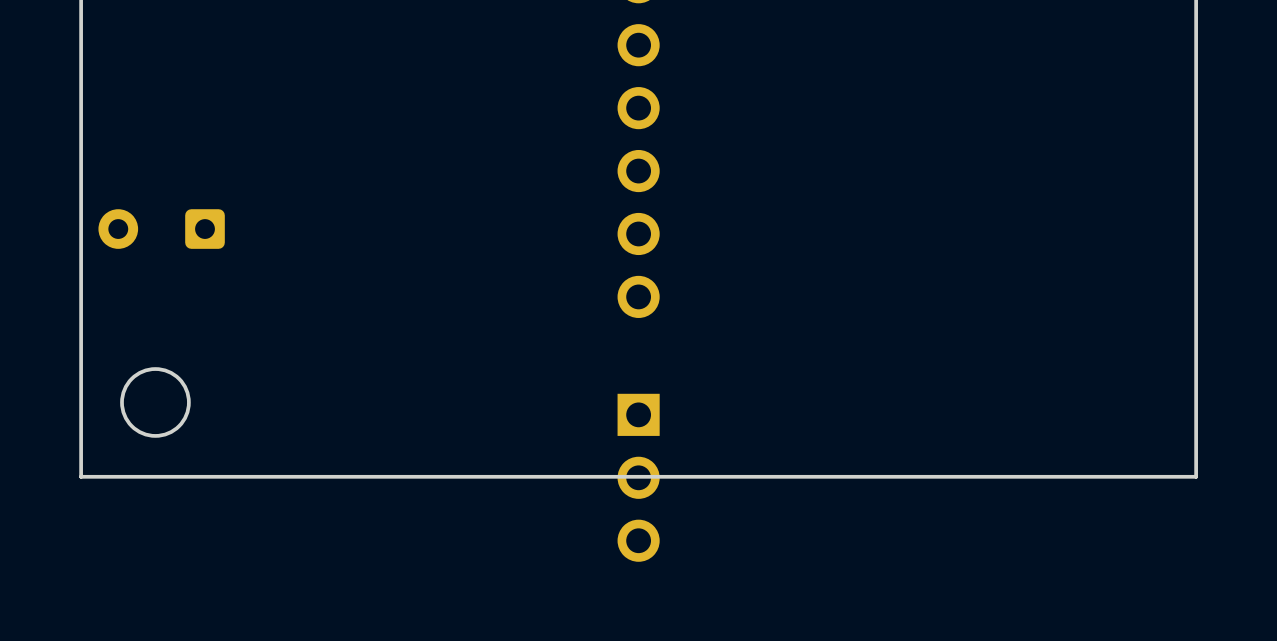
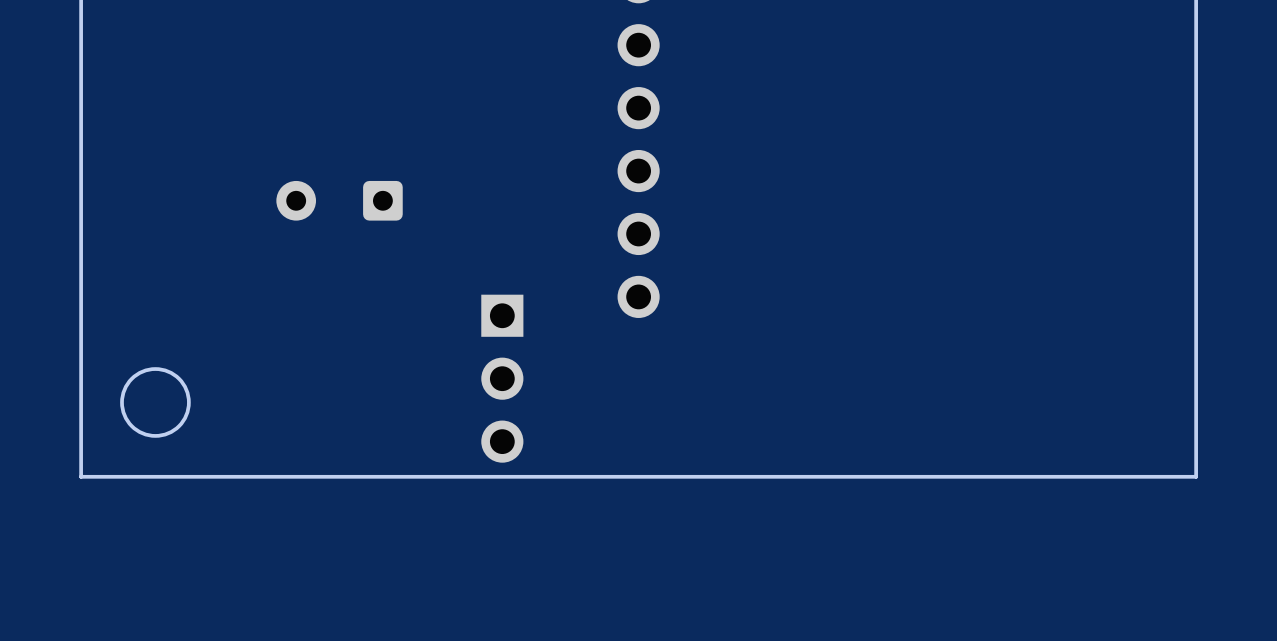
part position: (161, 229) -> (339, 200)
part position: (638, 477) -> (502, 378)

